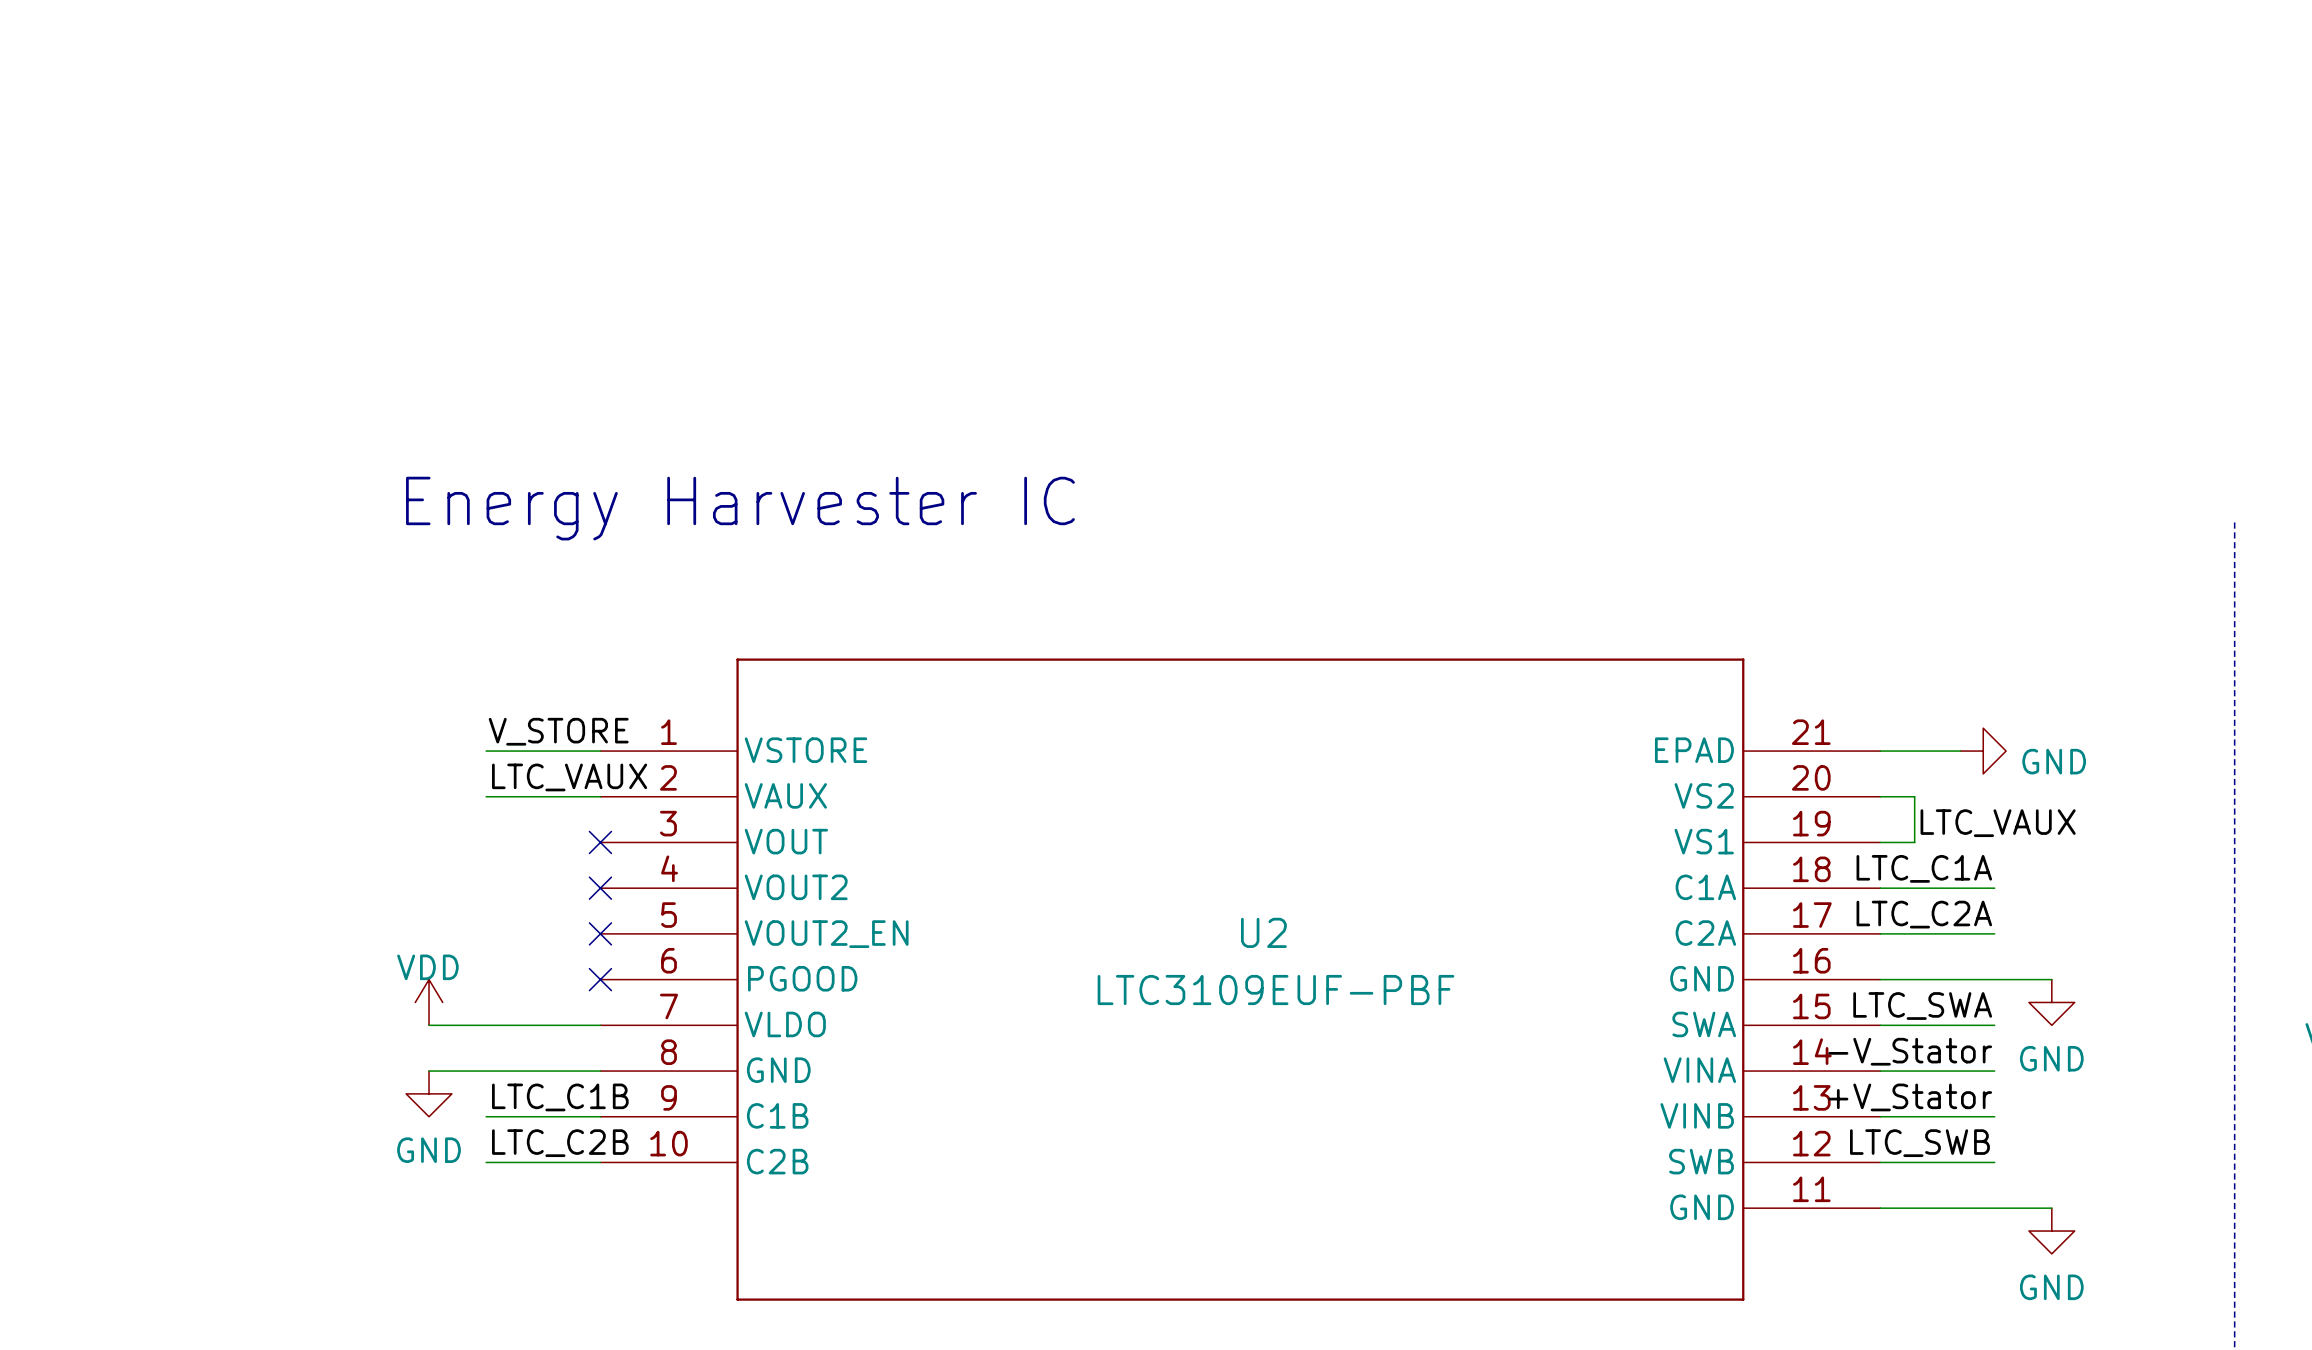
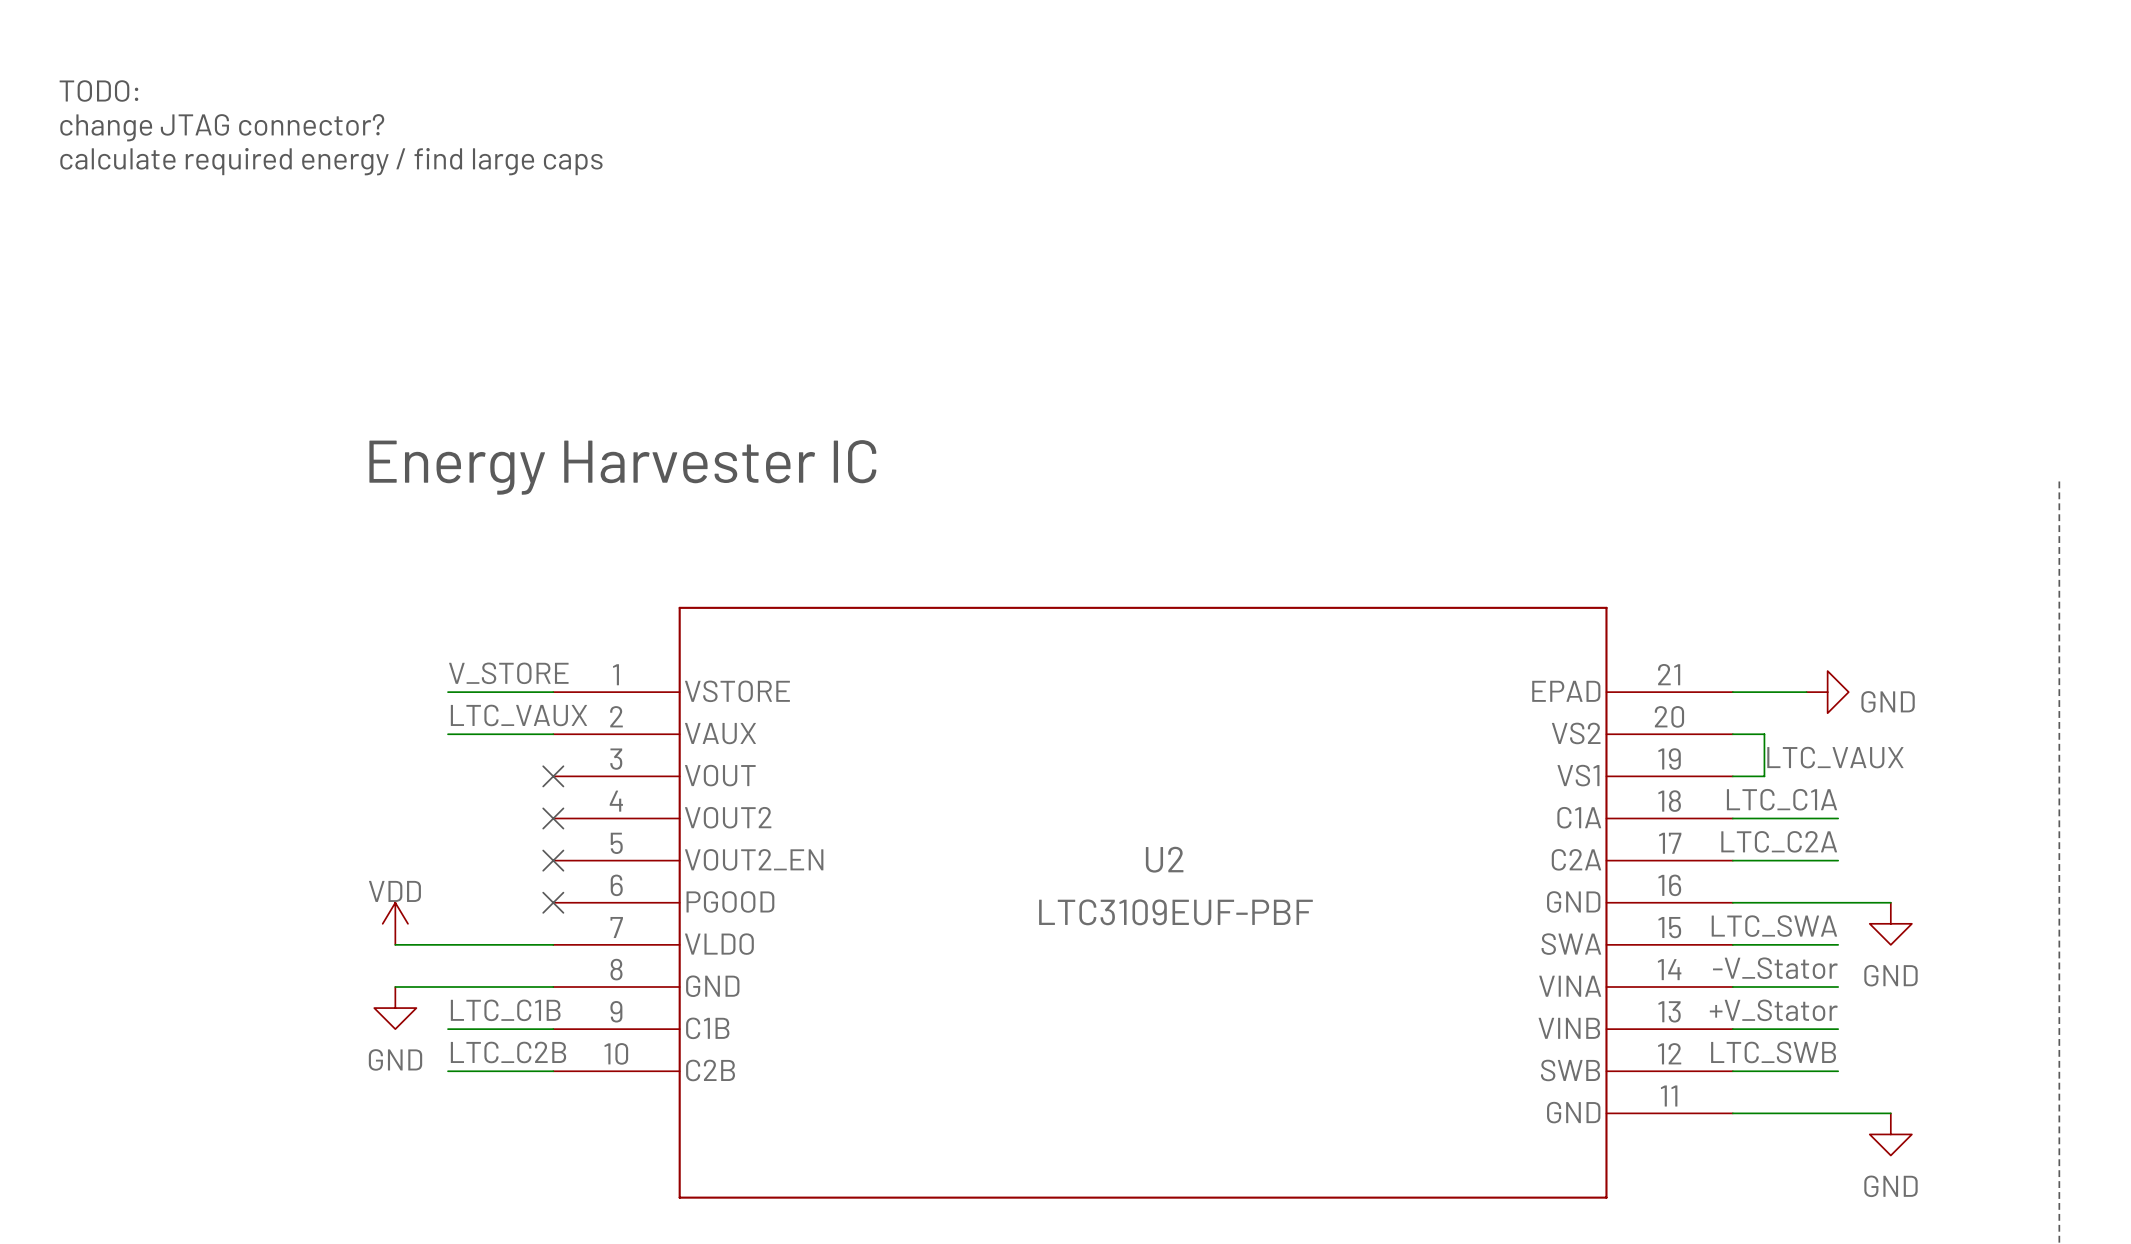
text: none -> TODO: (98, 90)
text: none -> change JTAG connector? (222, 127)
text: none -> calculate required energy / find large caps (331, 161)

